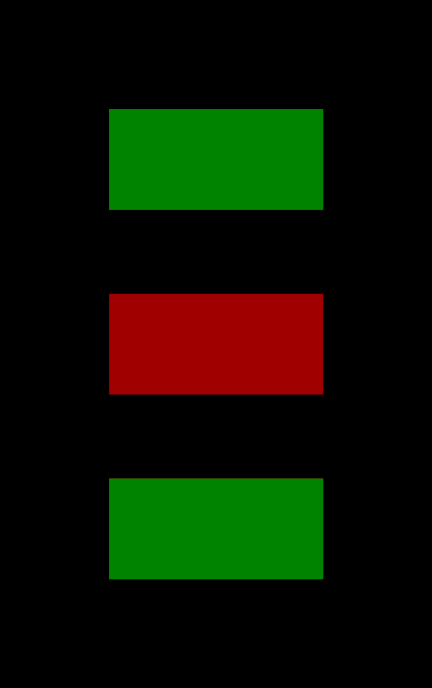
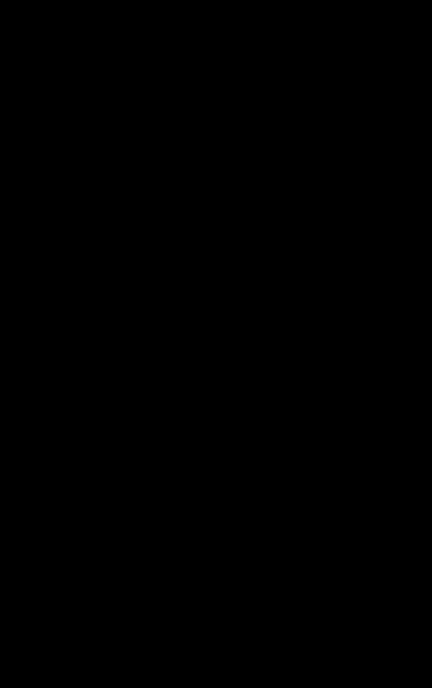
part: (216, 344) -> none

